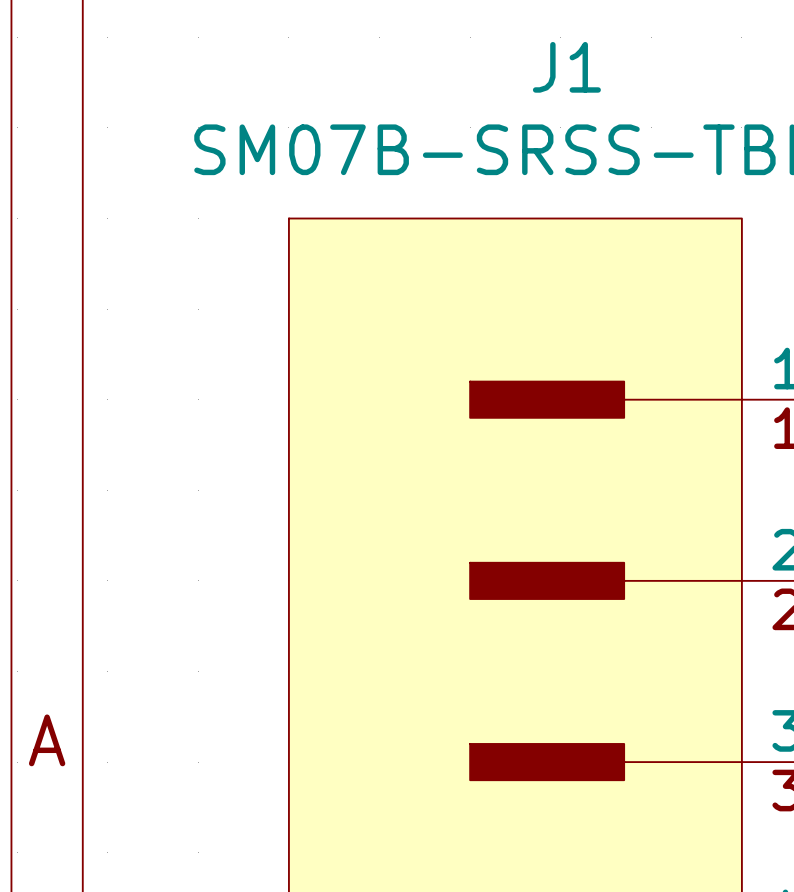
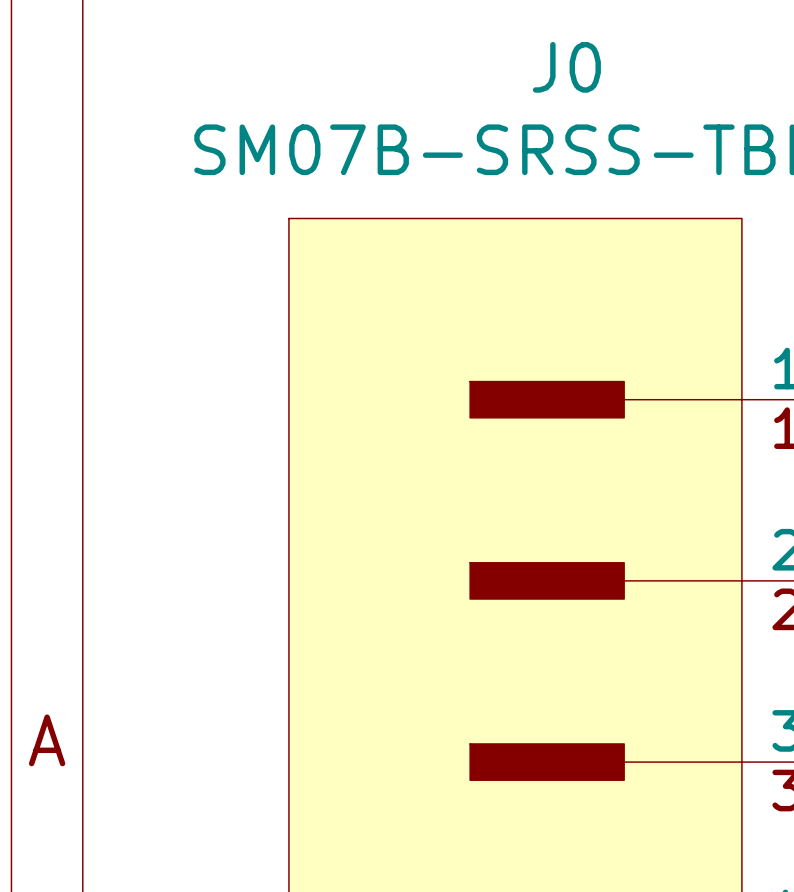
J1 name: J1 (566, 67) -> J0 (566, 67)

